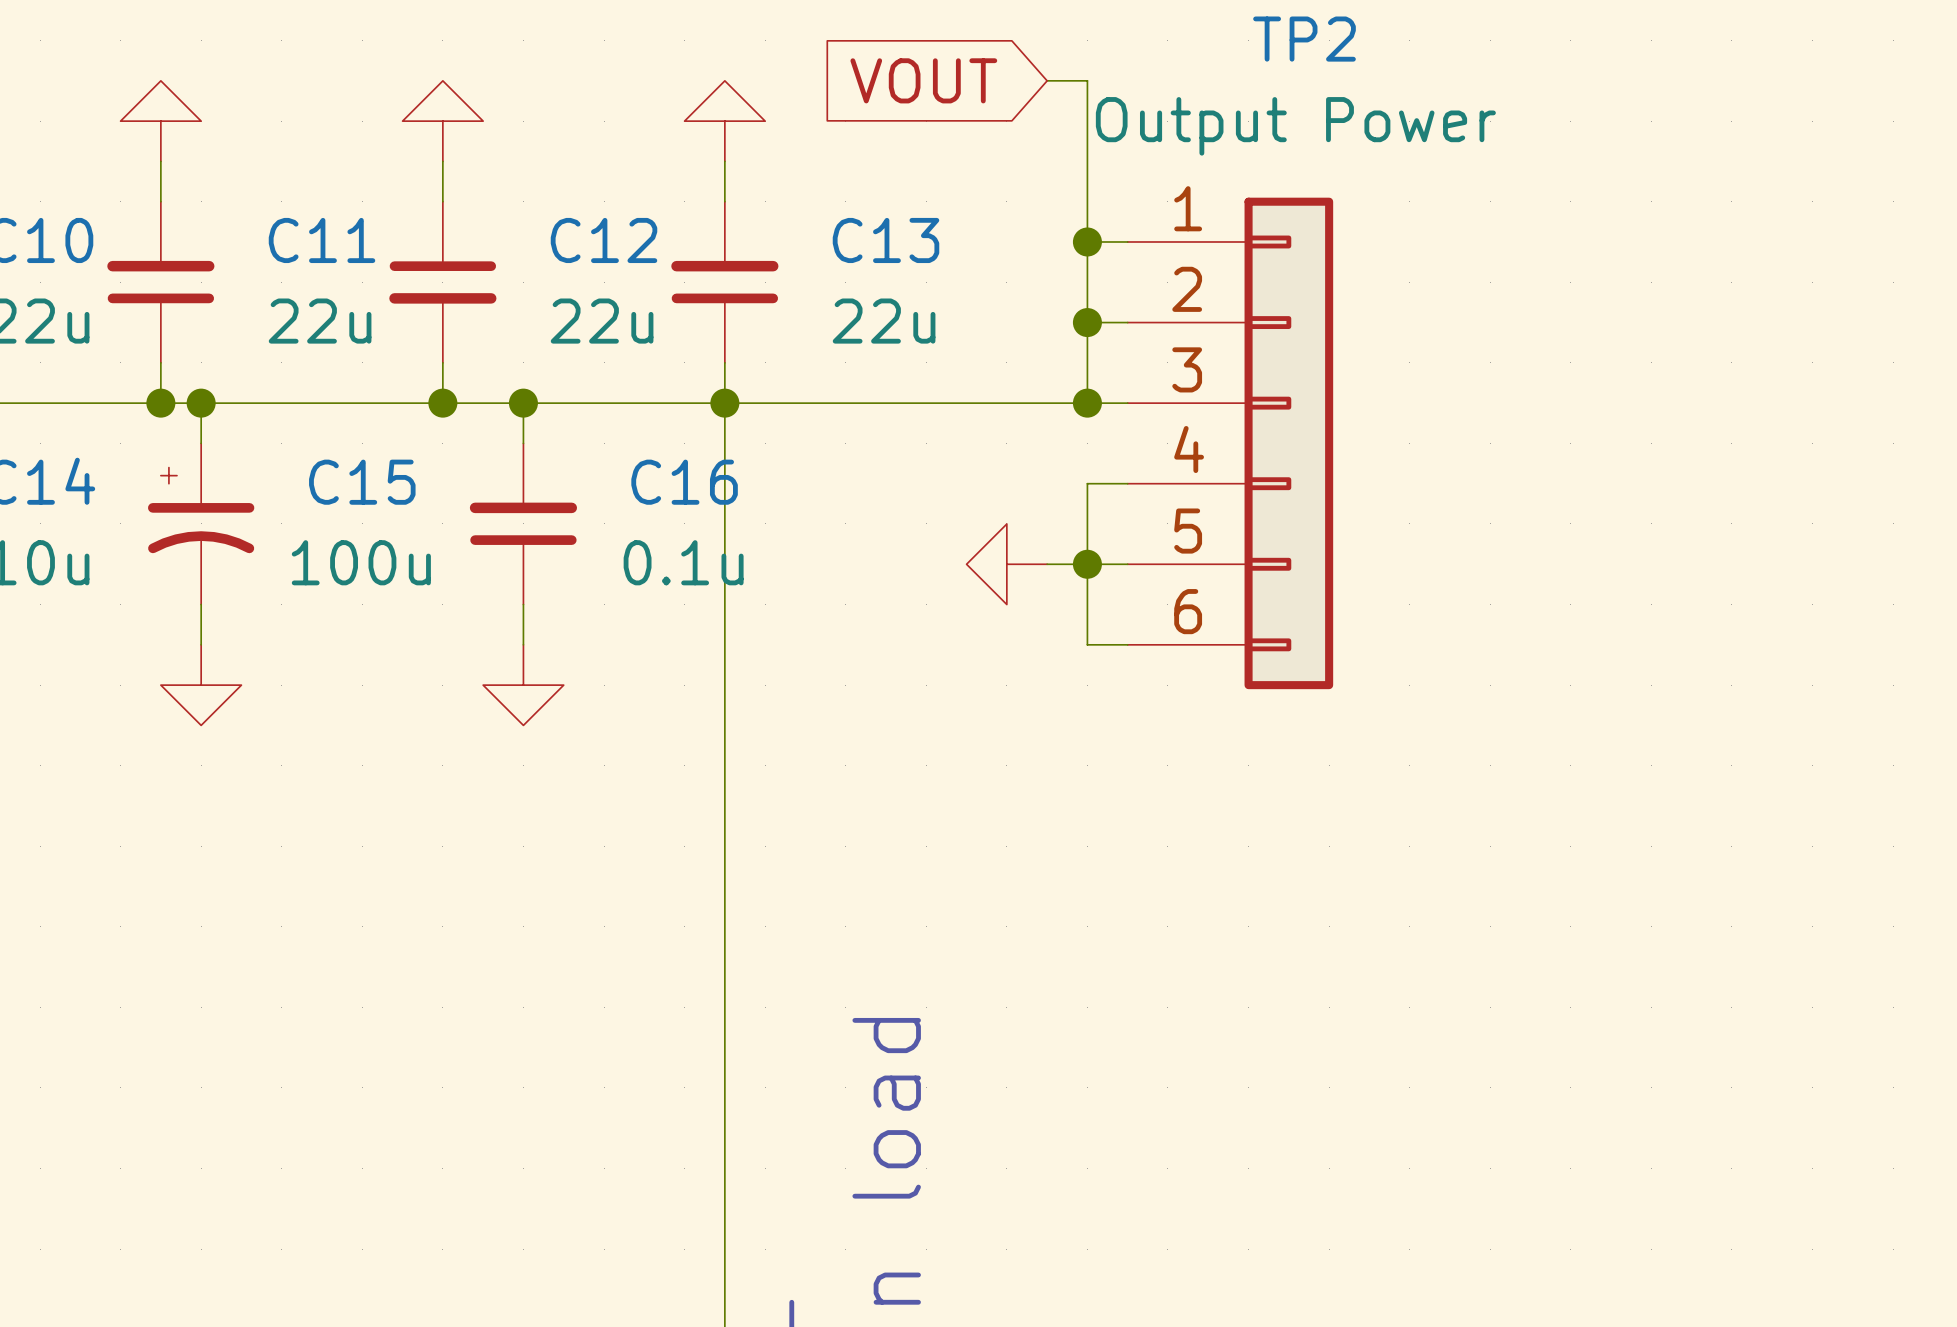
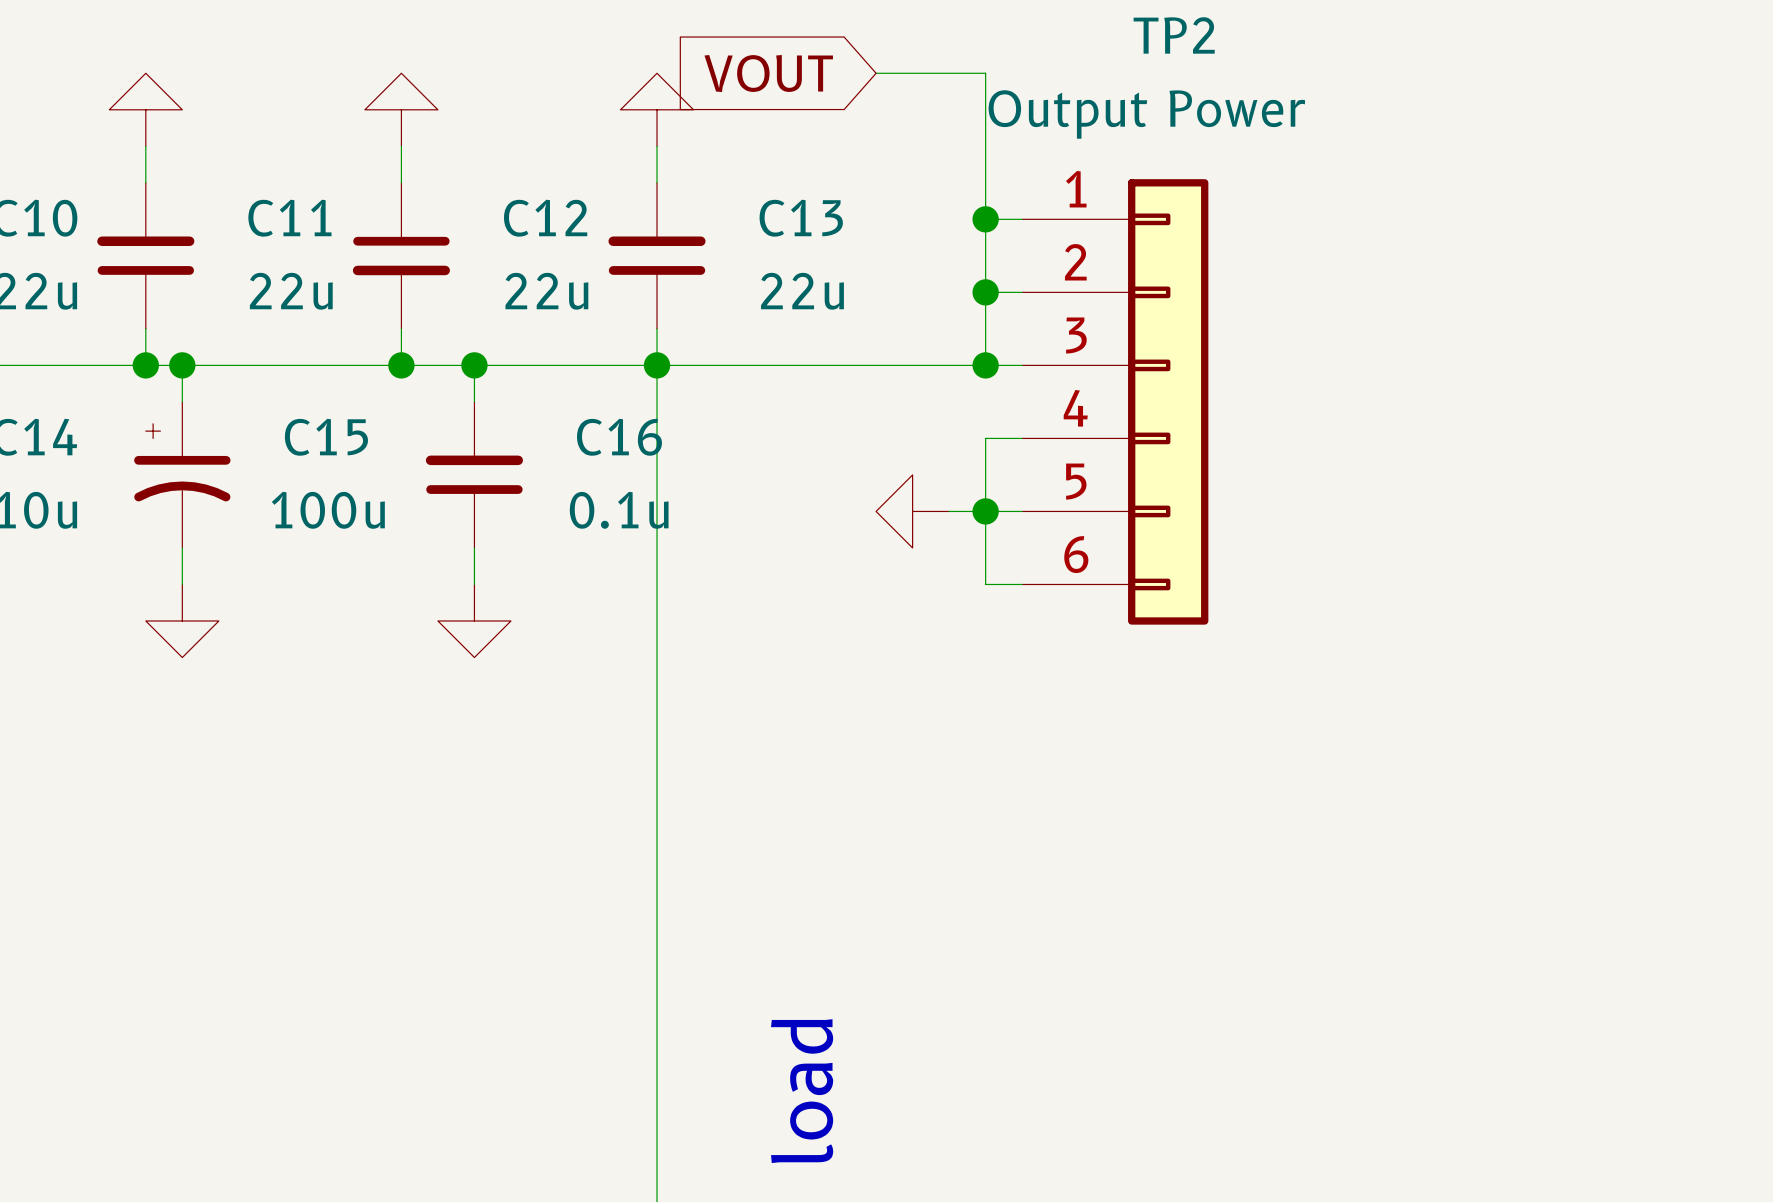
global label position: VOUT (923, 80) -> VOUT (768, 73)
wire: none -> (876, 73) (949, 73)

